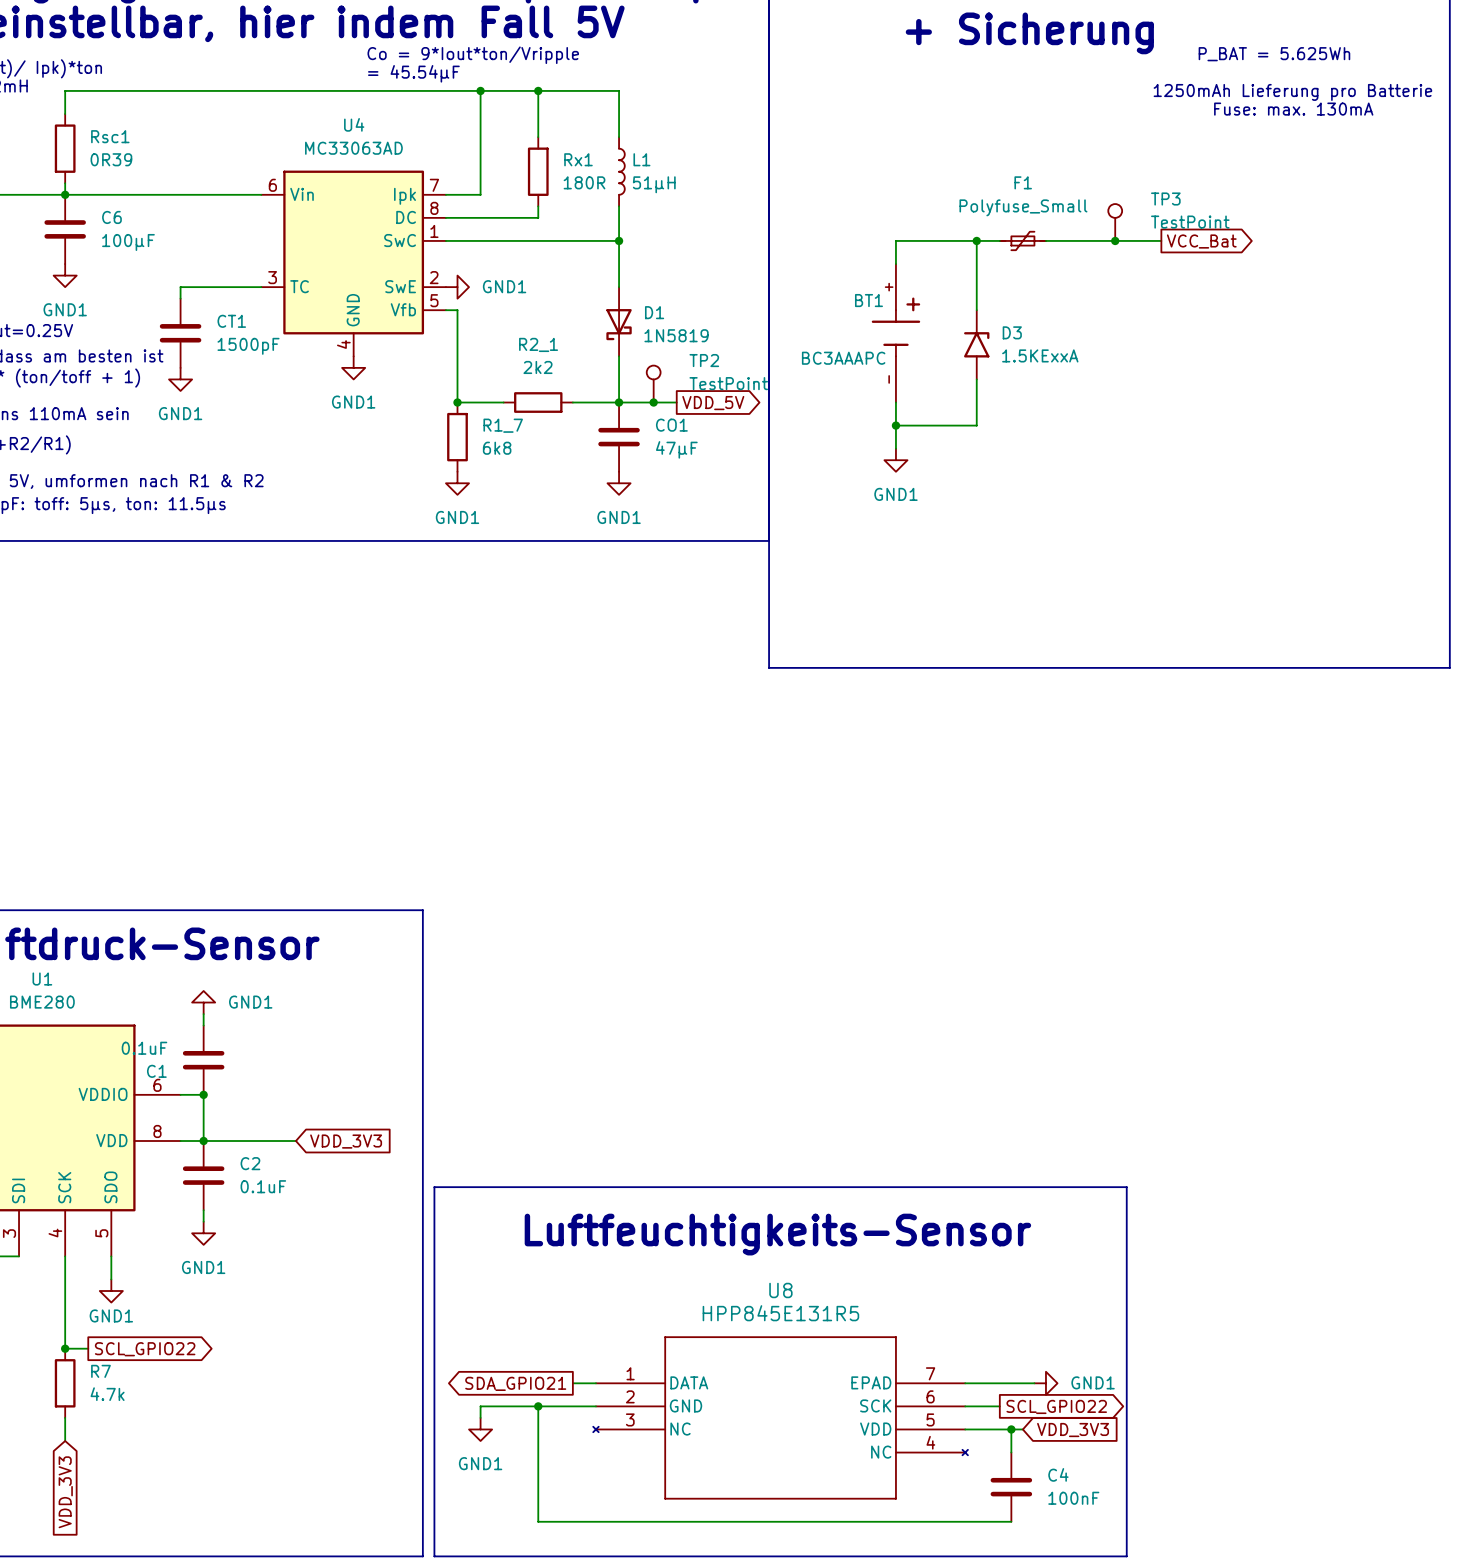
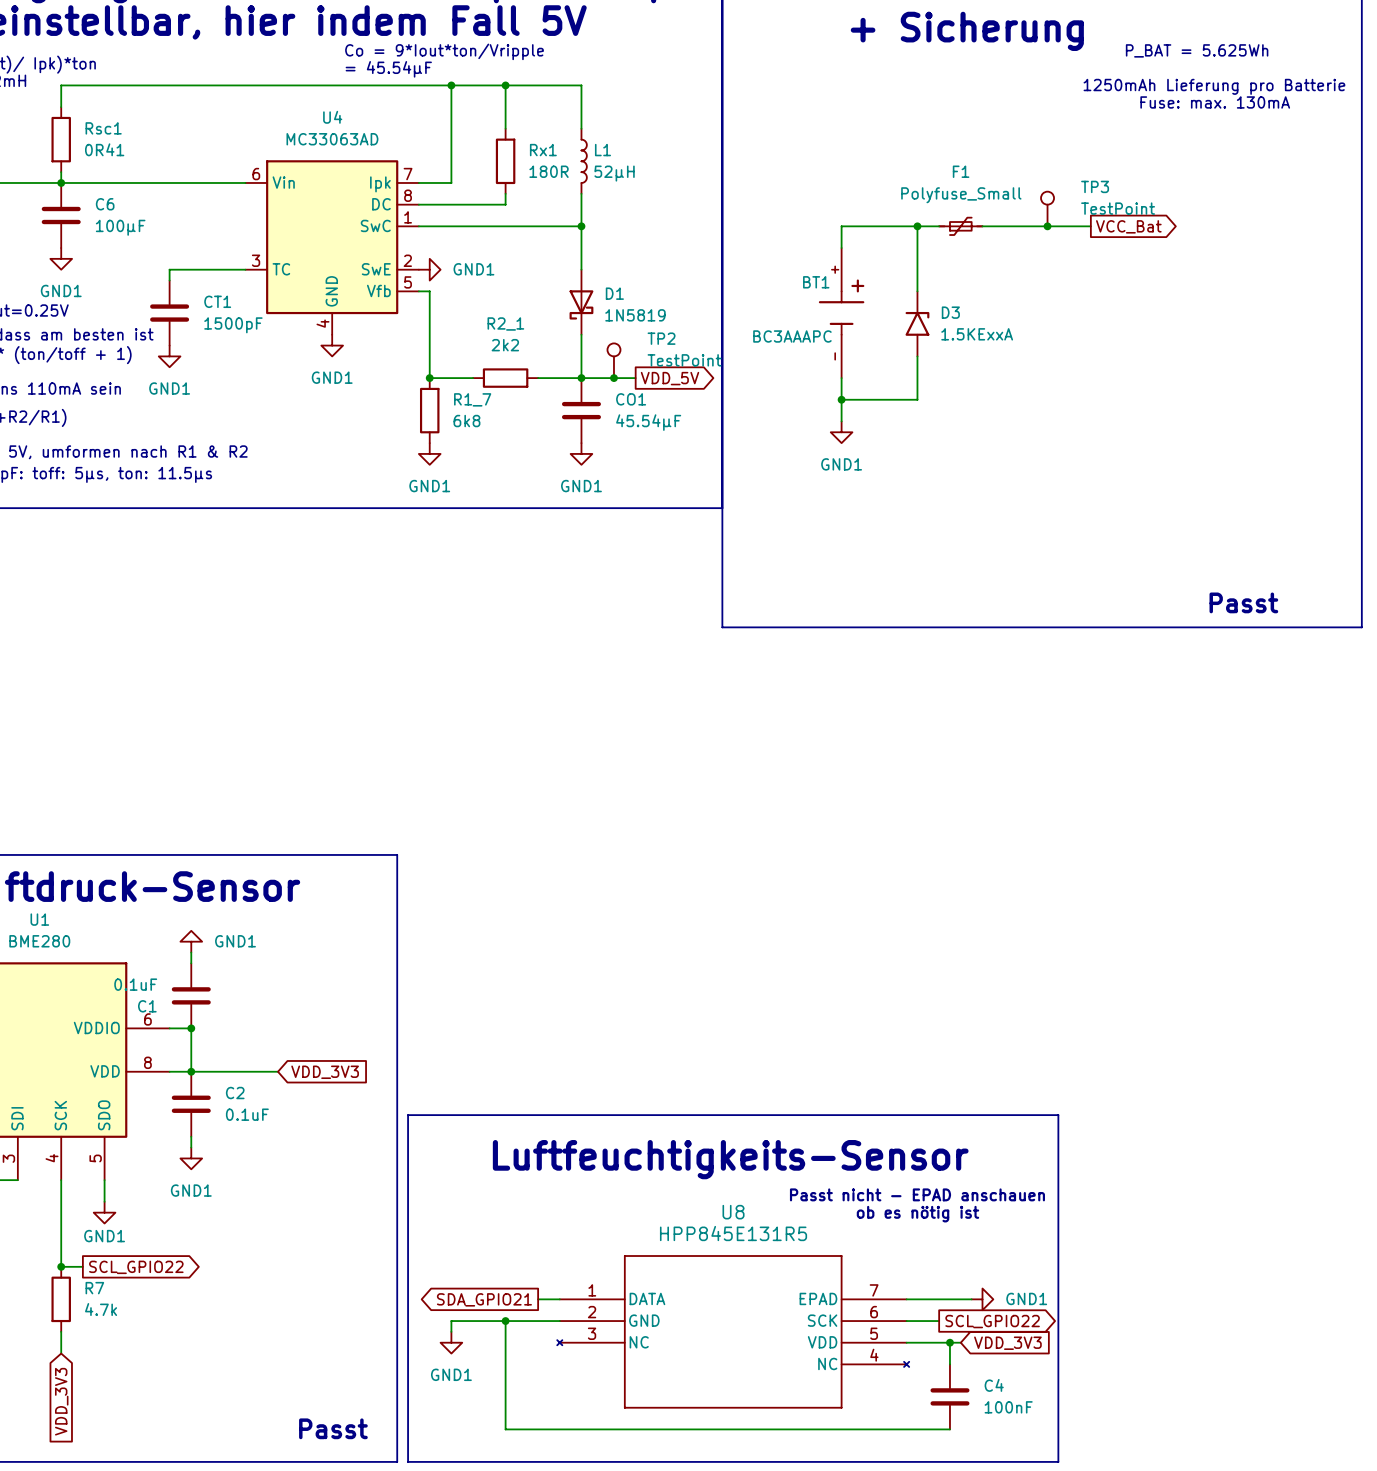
Rsc1 value: 0R39 (111, 159) -> 0R41 (104, 149)
L1 value: 51µH (654, 184) -> 52µH (614, 173)
CO1 value: 47µF (676, 449) -> 45.54µF (648, 422)
text: none -> Passt (1243, 602)
text: none -> Passt nicht - EPAD anschauen (917, 1194)
text: none -> ob es nötig ist (917, 1214)
text: none -> Passt (333, 1428)

